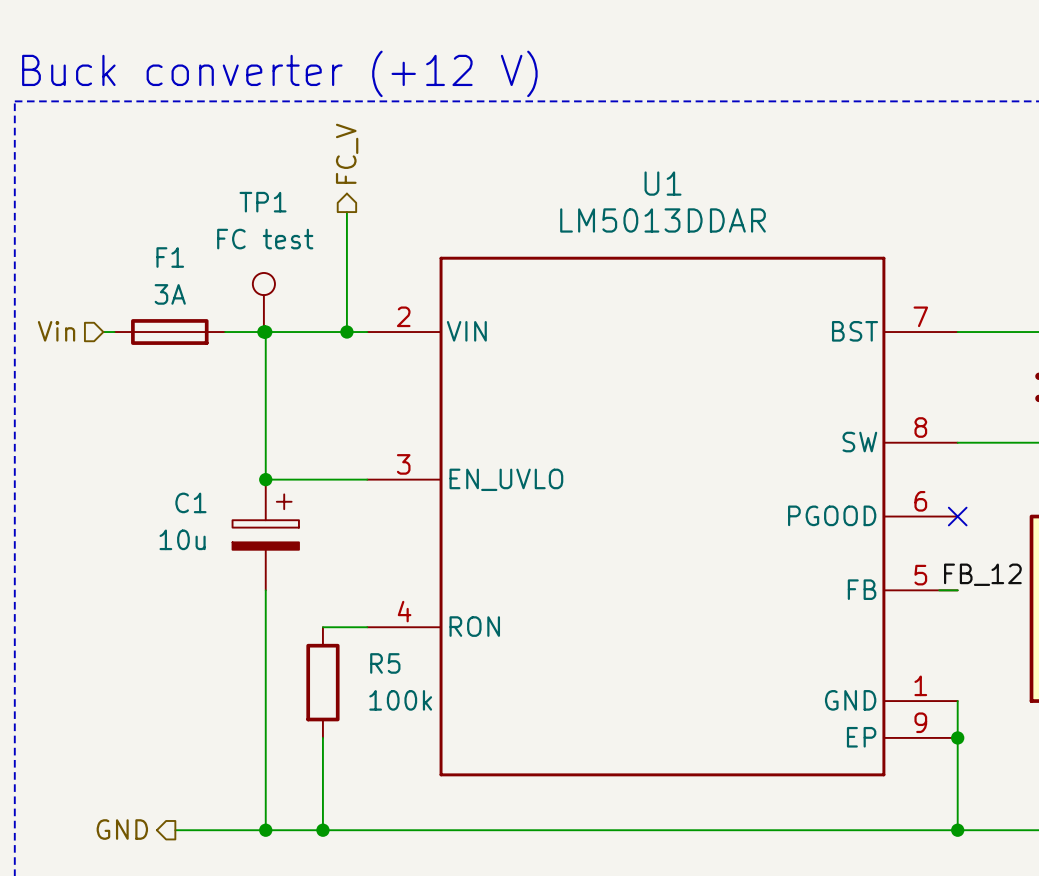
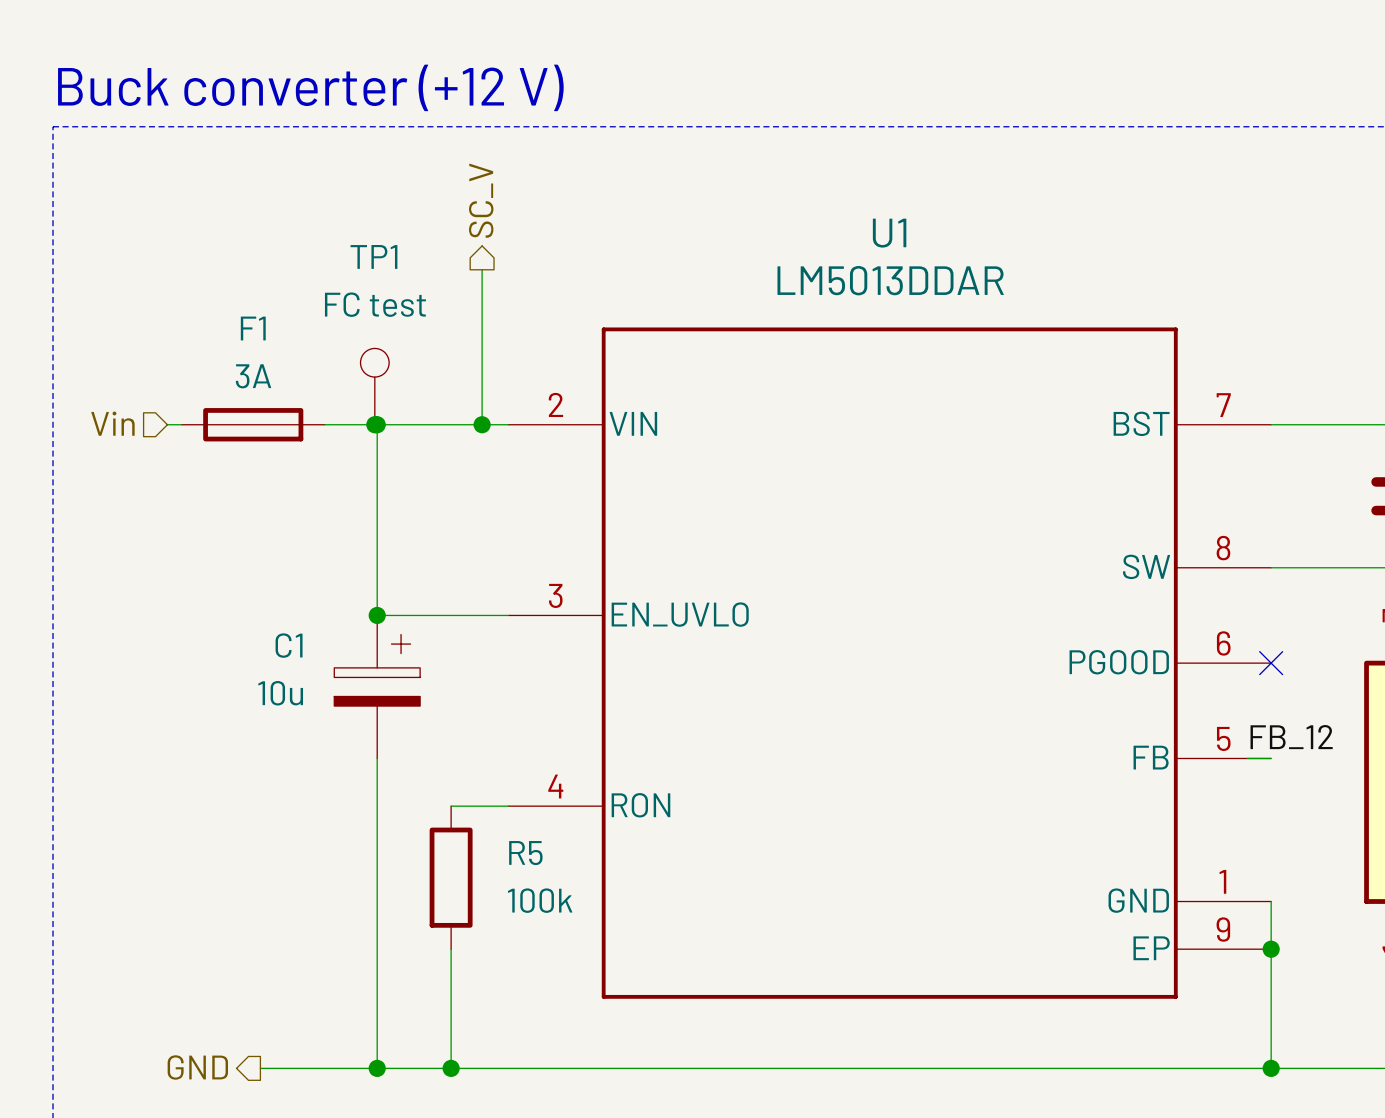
hierarchical label: FC_V (347, 153) -> SC_V (481, 200)

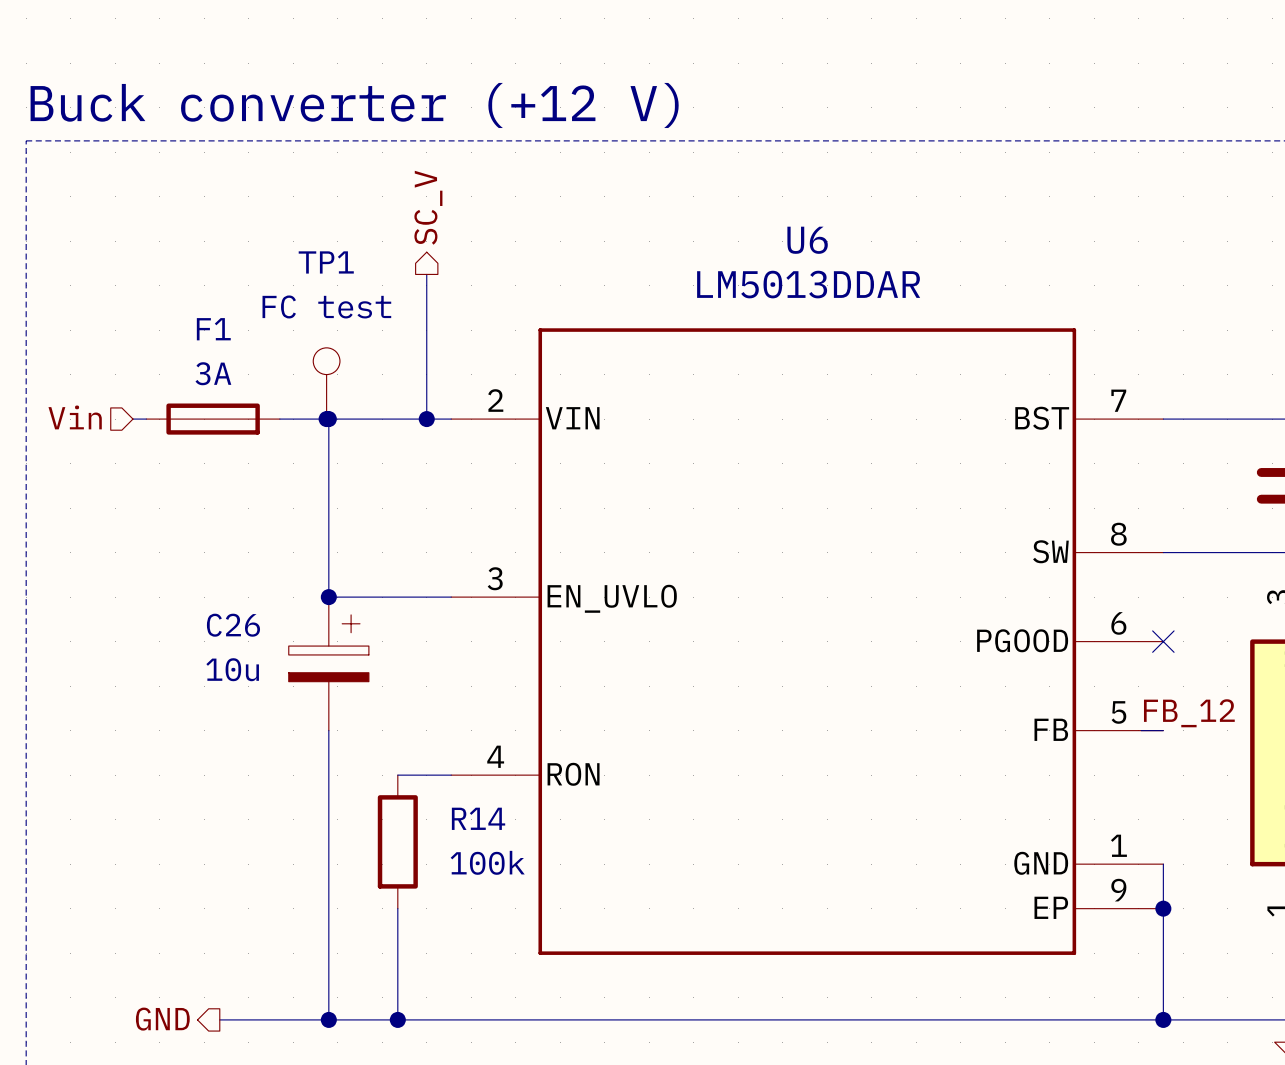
U1 name: U1 (889, 233) -> U6 (807, 240)
C1 name: C1 (289, 645) -> C26 (233, 625)
R5 name: R5 (525, 853) -> R14 (478, 818)

